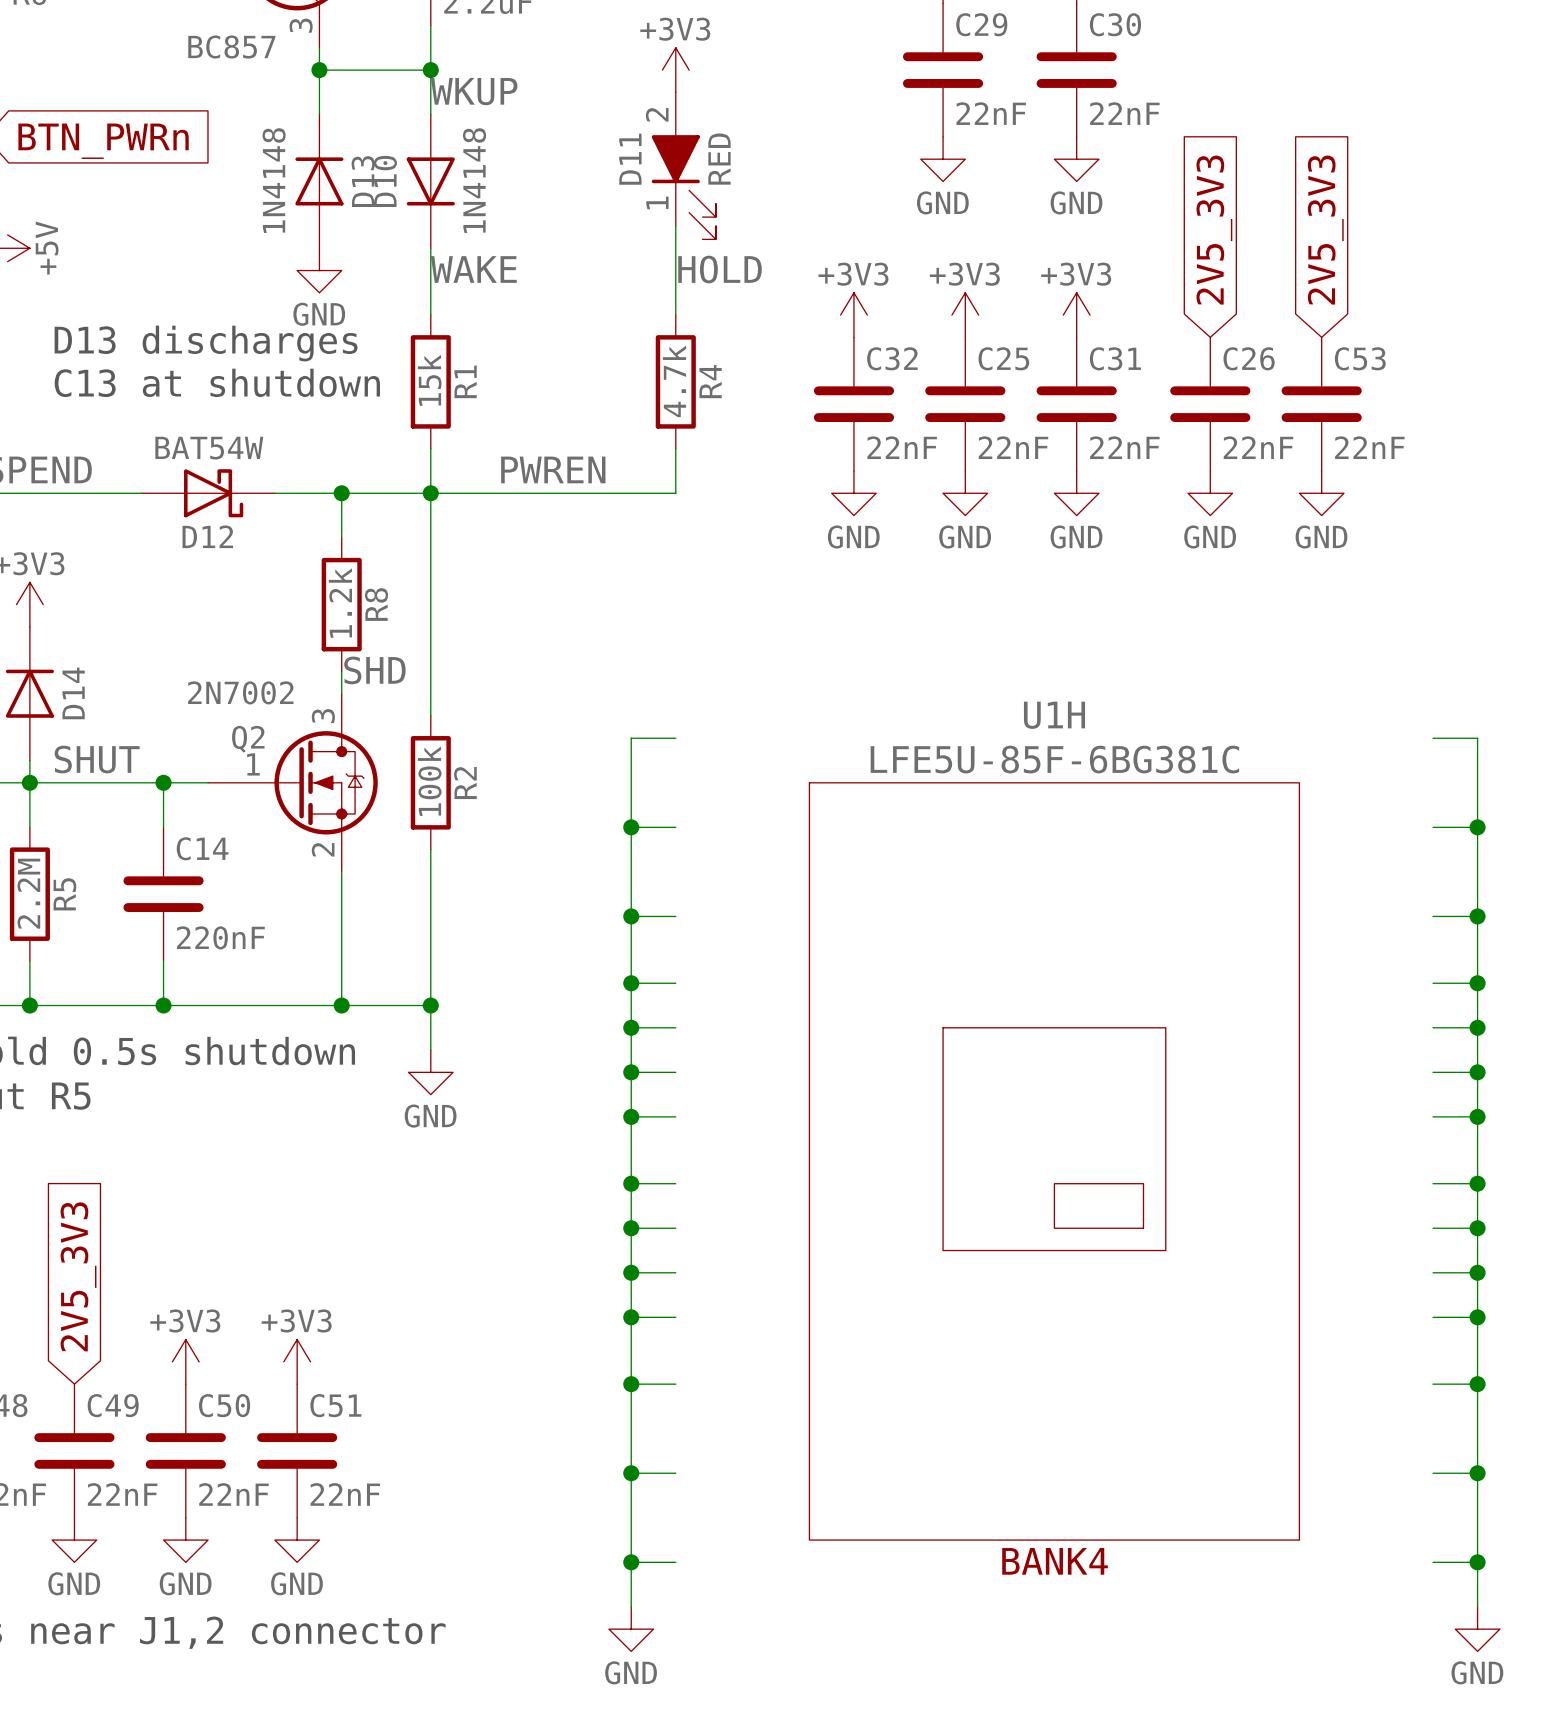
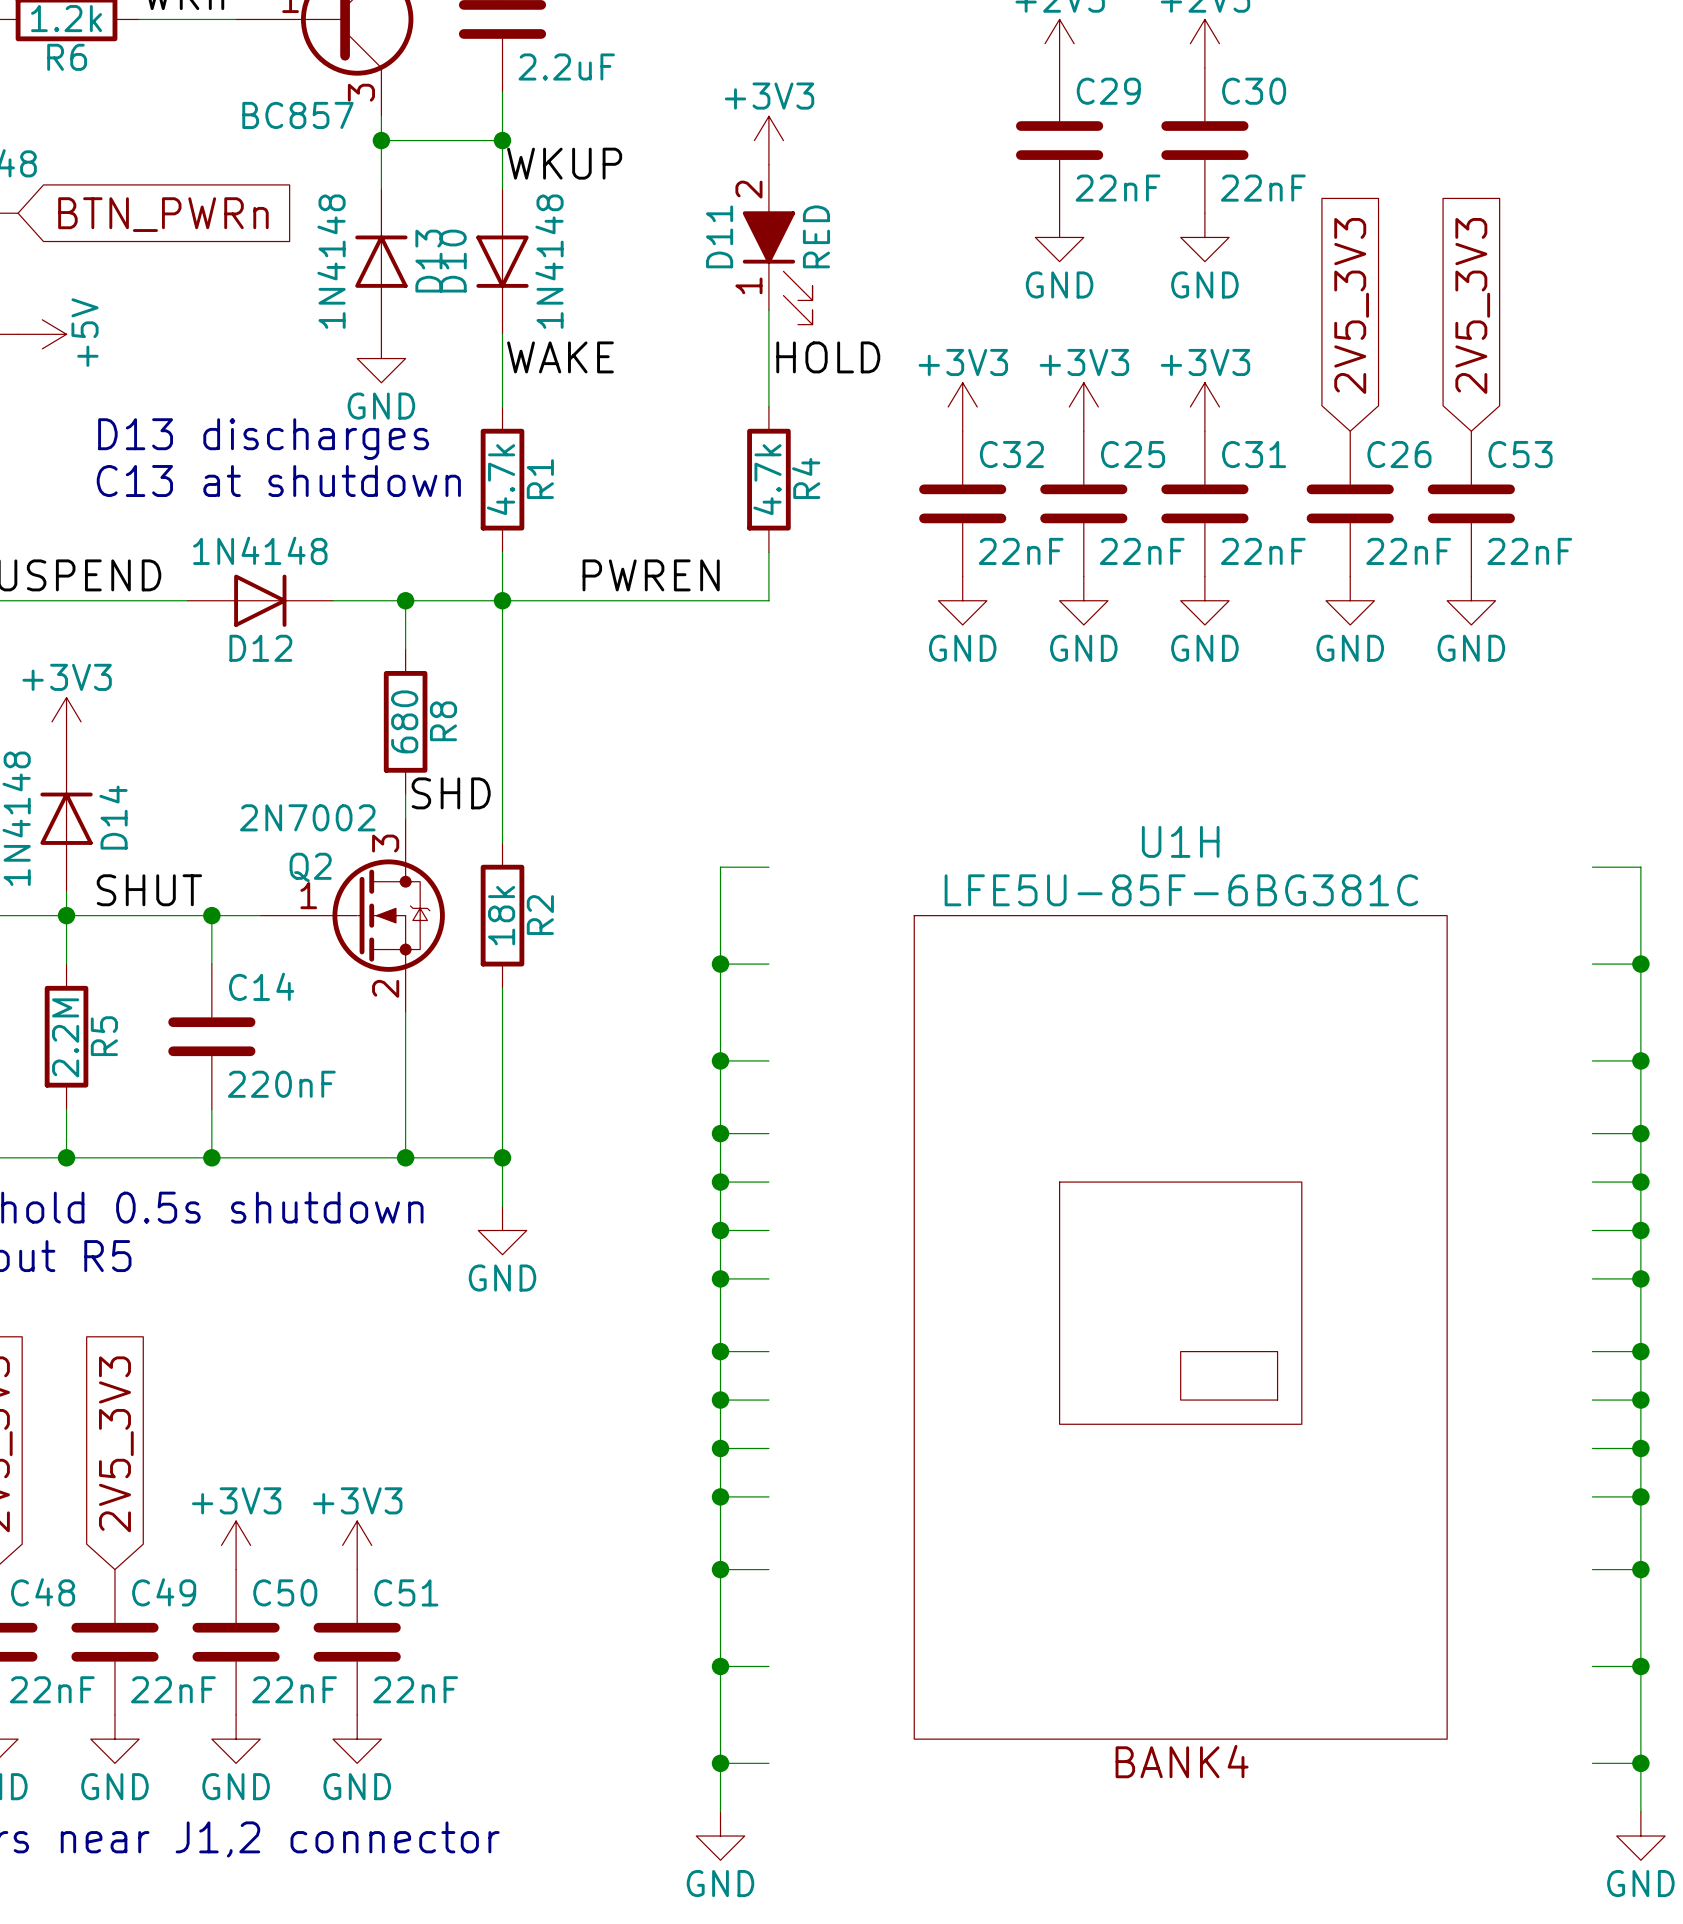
R1 value: 15k (429, 380) -> 4.7k (501, 479)
D12 value: BAT54W (209, 448) -> 1N4148 (260, 550)
D12 symbol: [141, 469, 275, 518] -> [187, 574, 333, 627]
R8 value: 1.2k (340, 603) -> 680 (404, 721)
R2 value: 100k (429, 781) -> 18k (501, 915)

